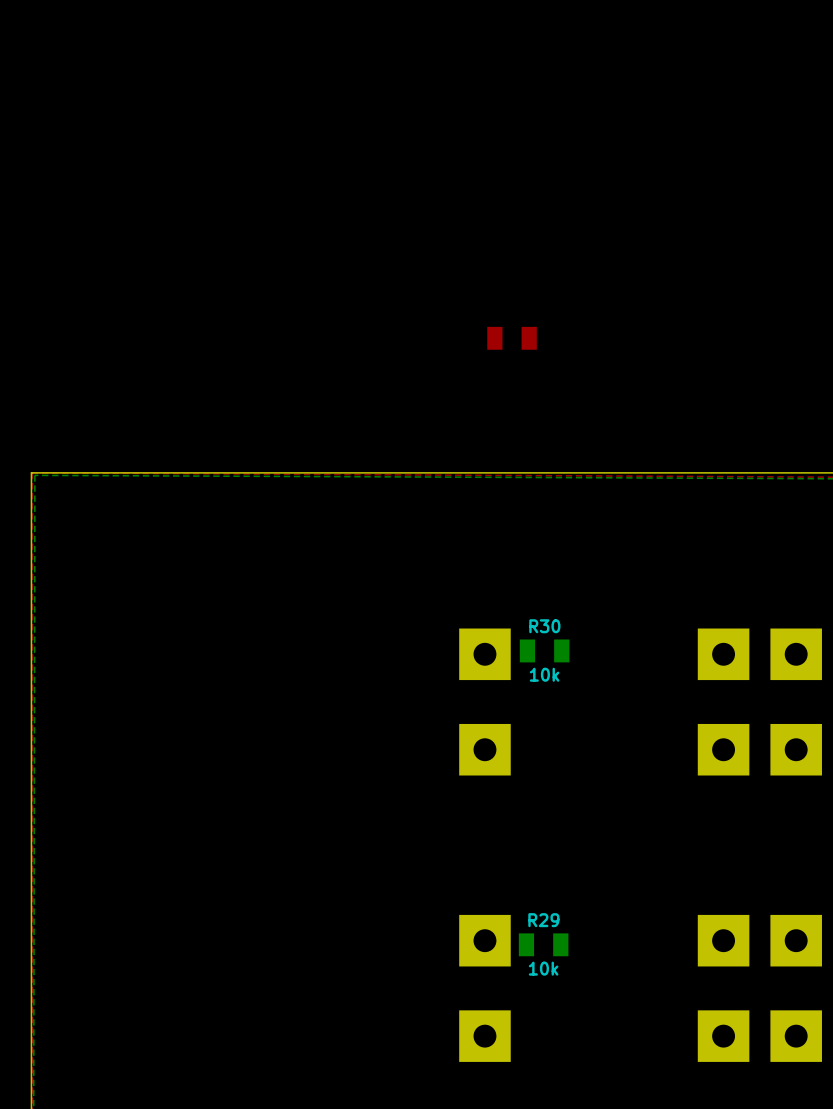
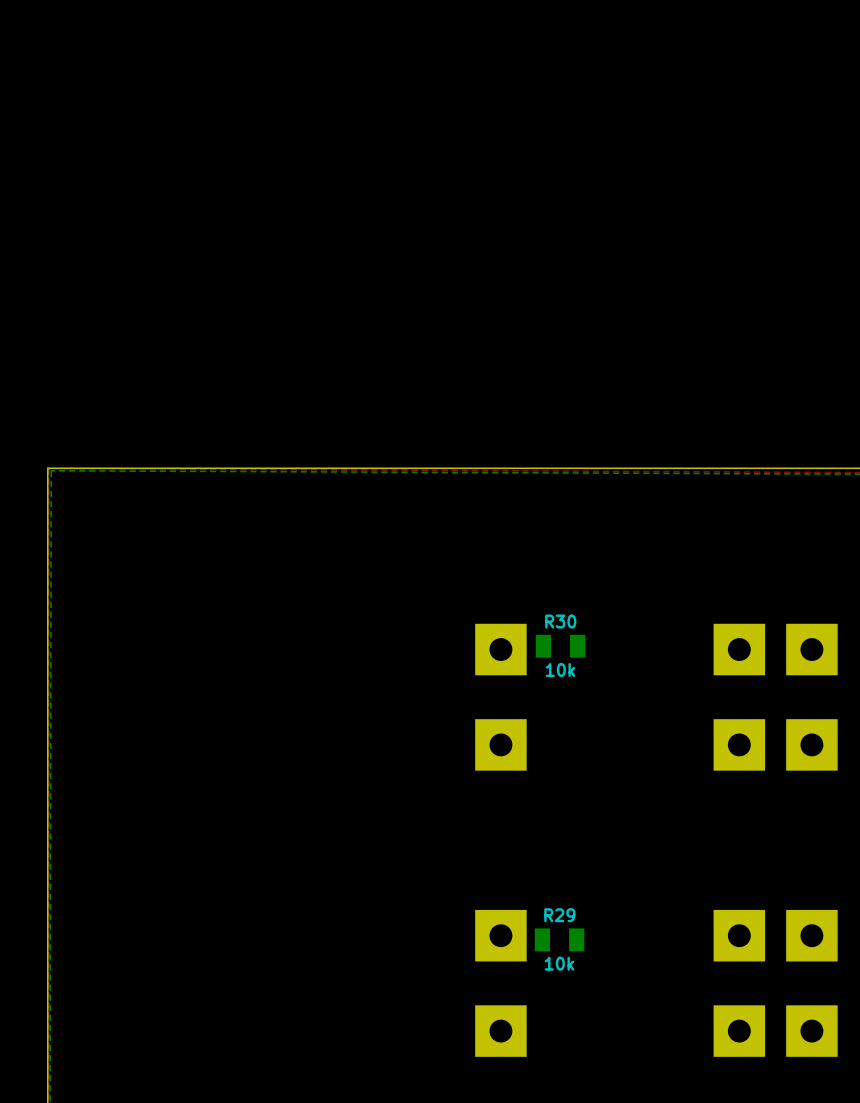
part: (512, 338) -> none

